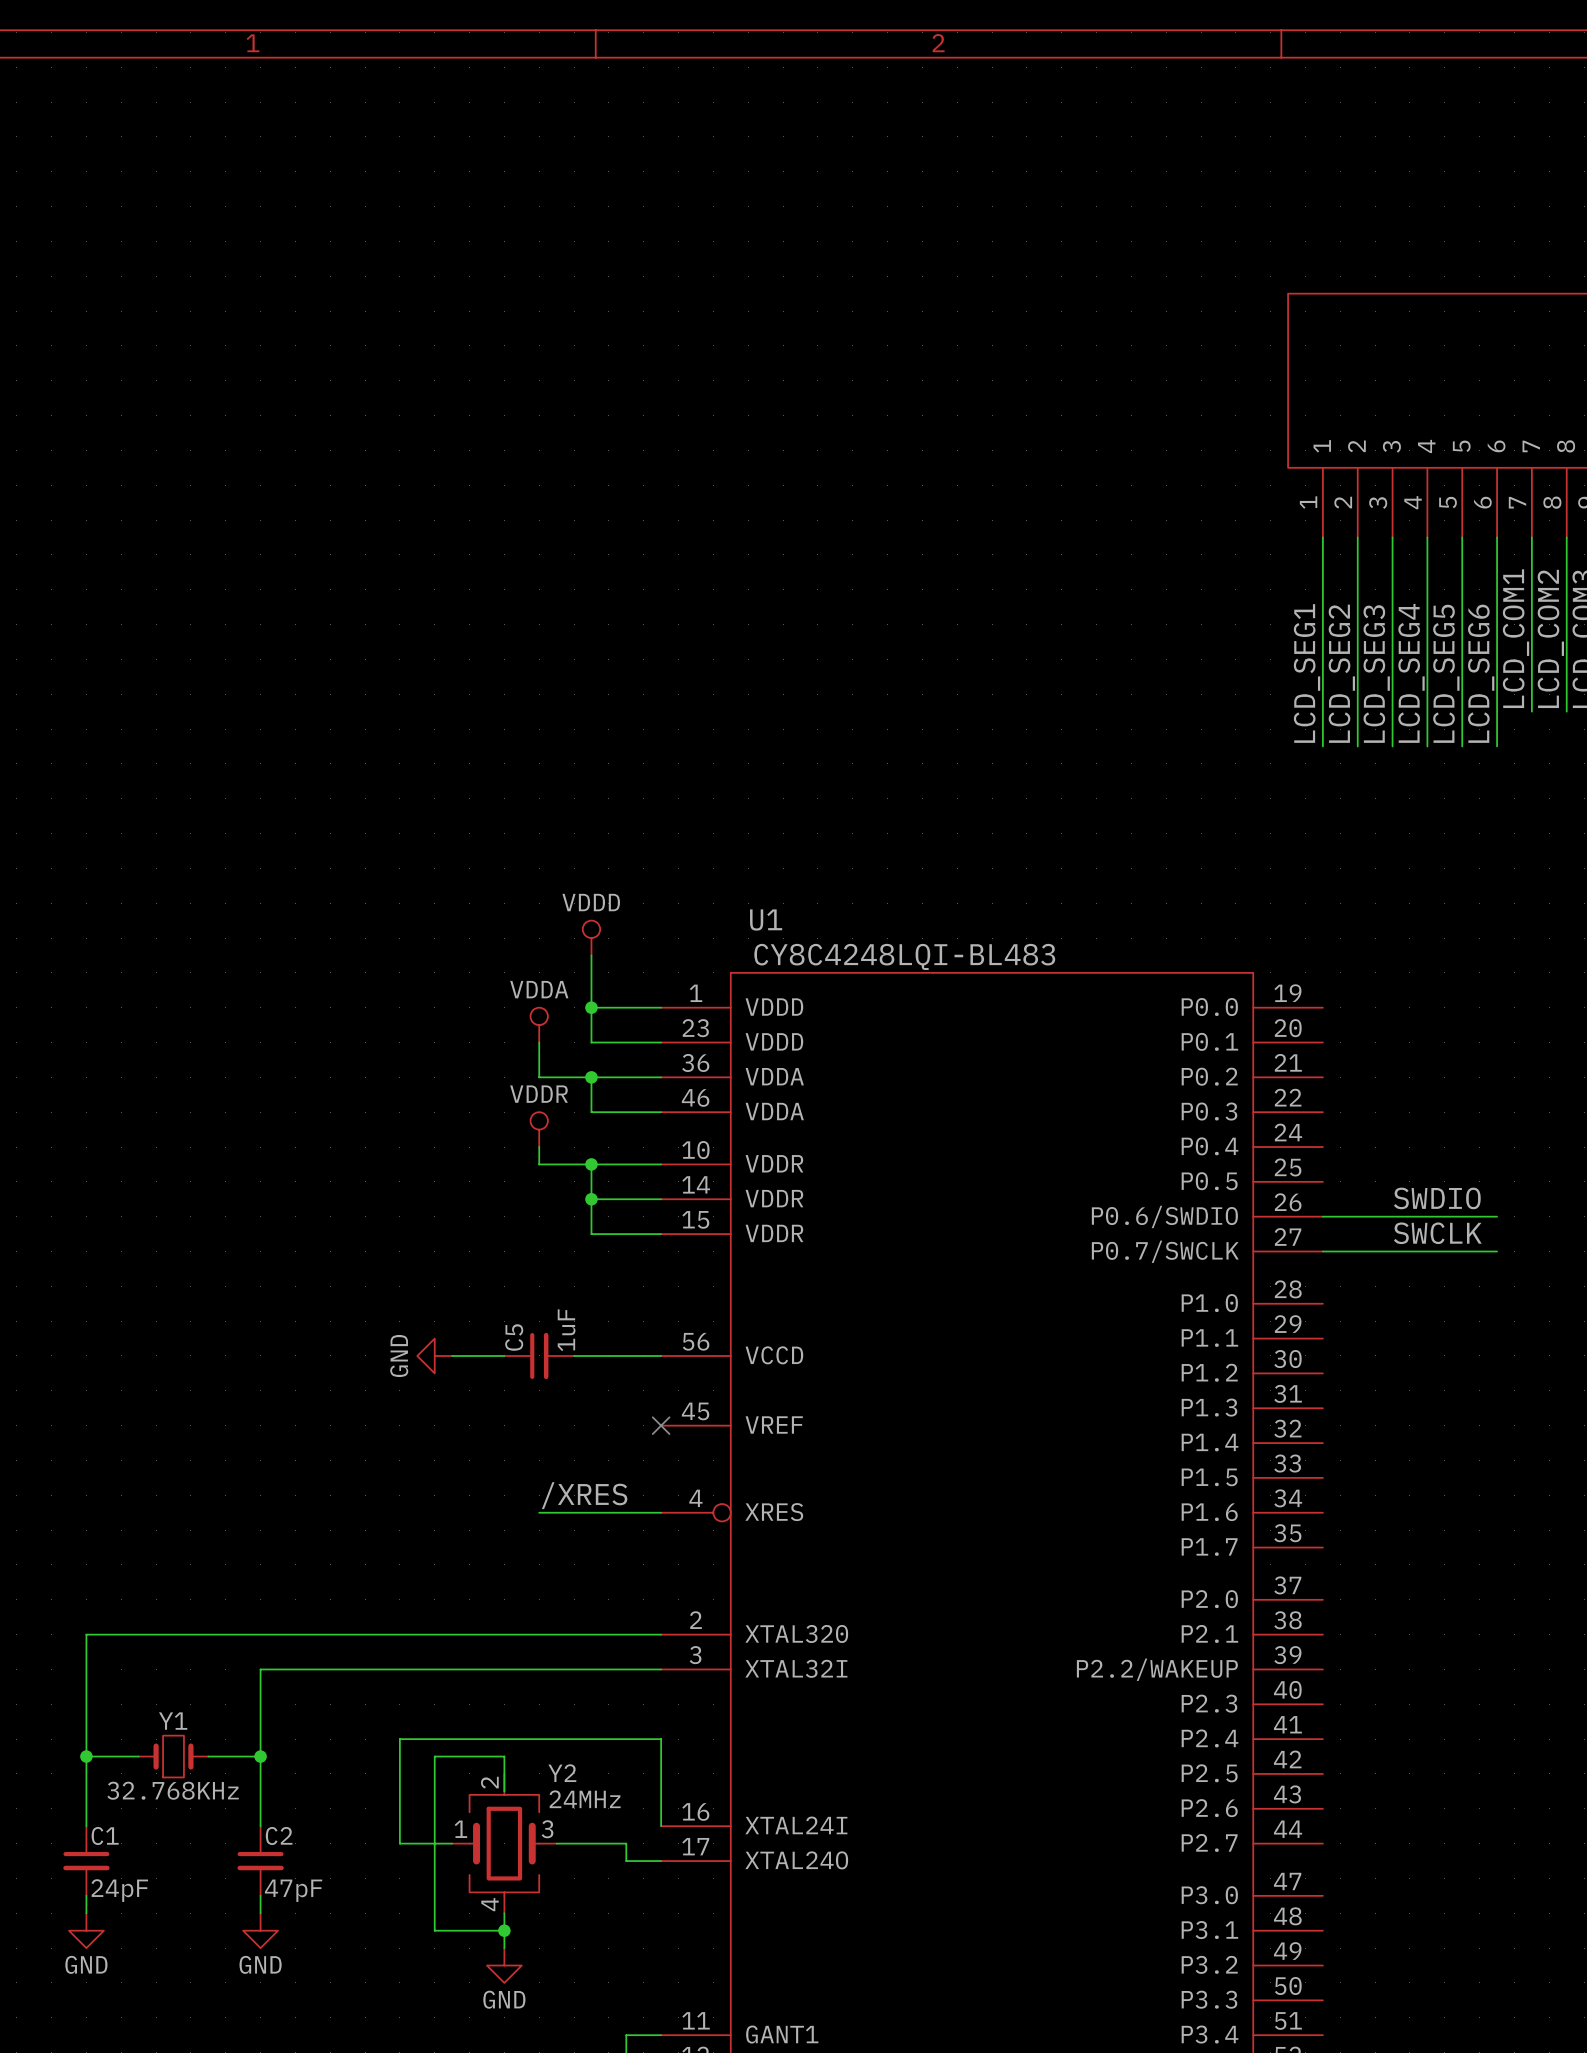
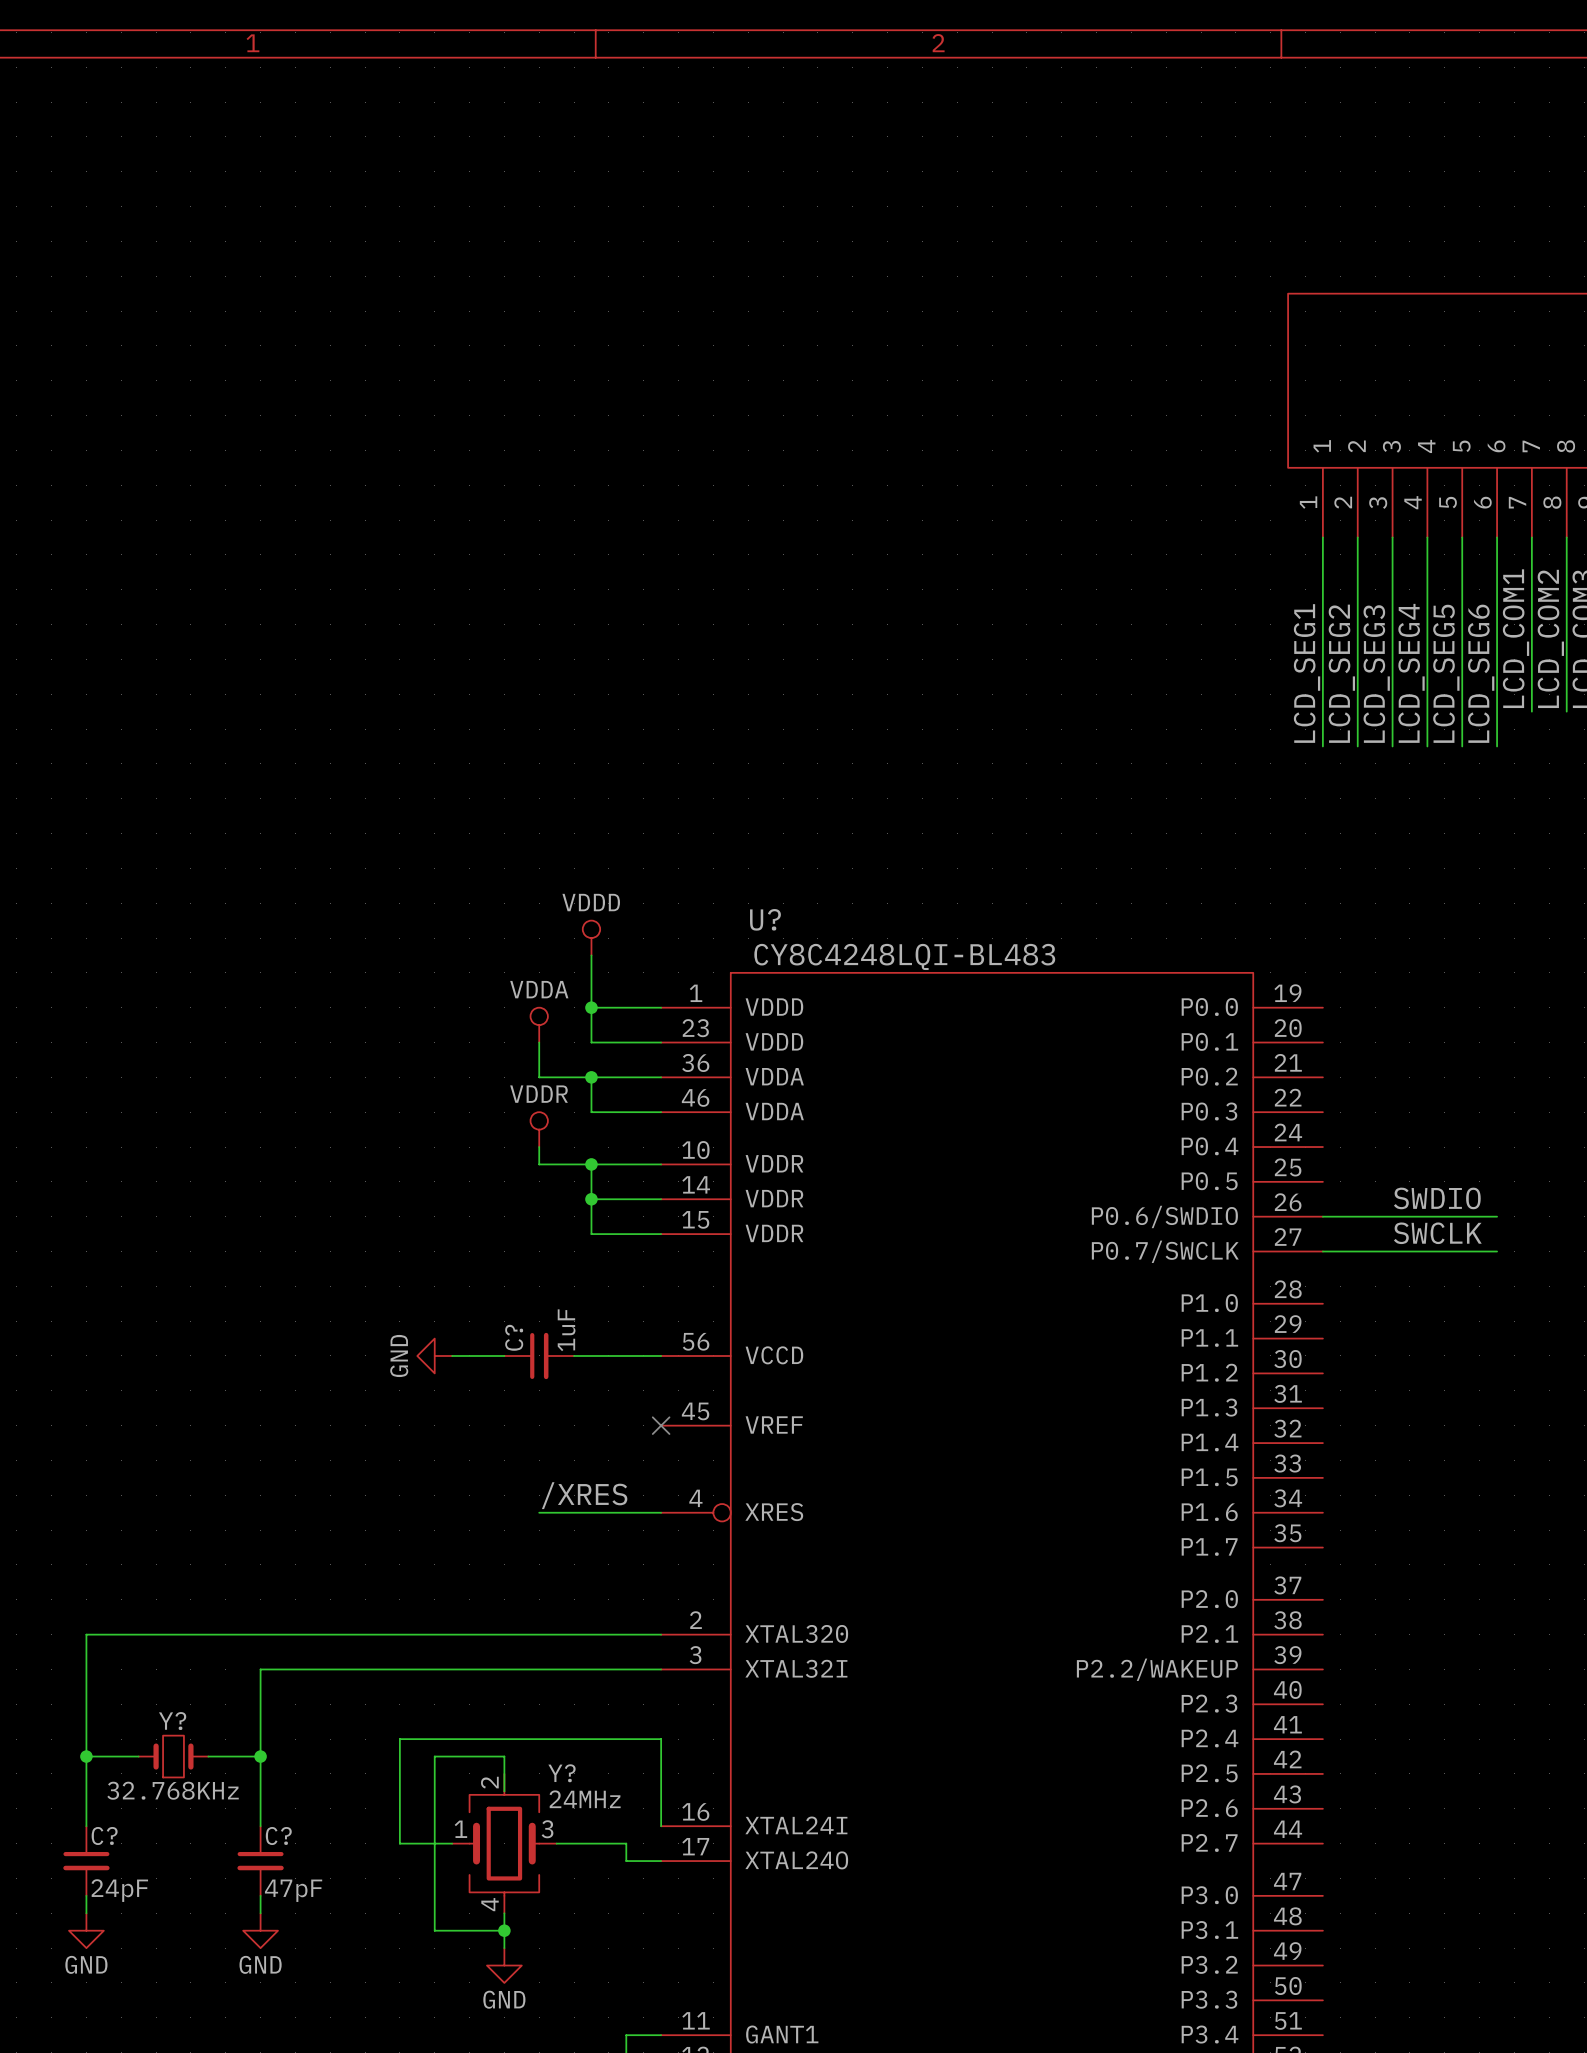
U1 name: U1 (766, 920) -> U? (765, 919)
C5 name: C5 (514, 1337) -> C? (514, 1337)
Y1 name: Y1 (173, 1721) -> Y? (172, 1721)
Y2 name: Y2 (562, 1773) -> Y? (561, 1773)
C1 name: C1 (105, 1836) -> C? (104, 1836)
C2 name: C2 (279, 1836) -> C? (278, 1836)

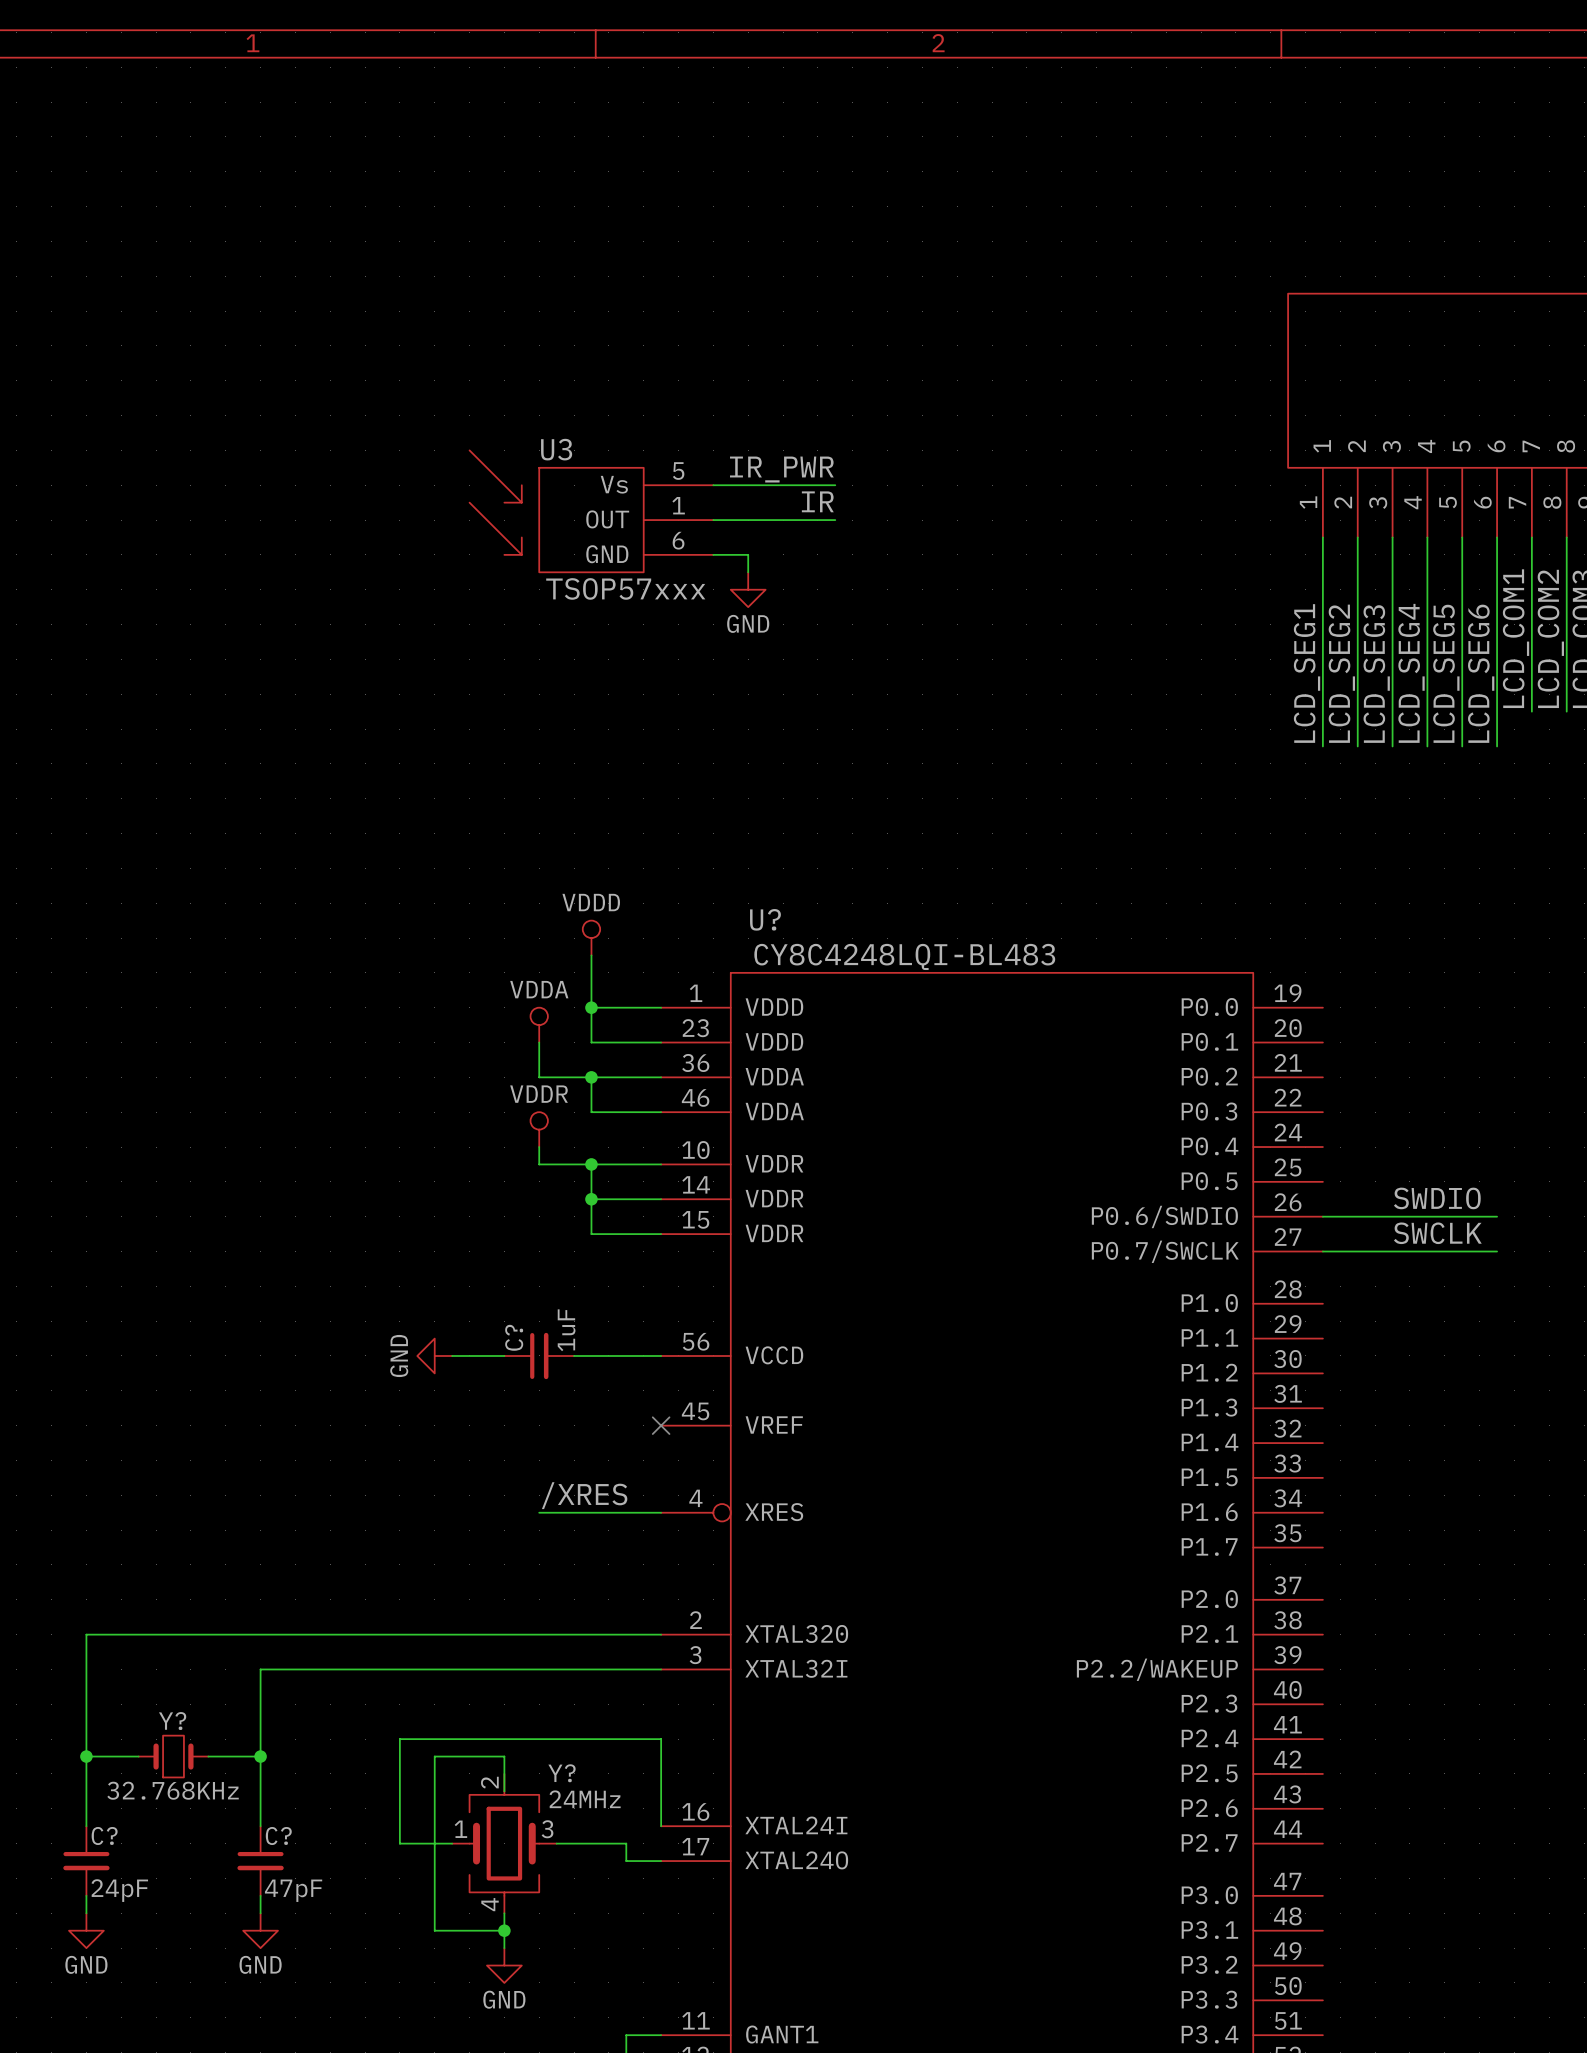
label: none -> IR_PWR (781, 469)
wire: none -> (713, 485) (835, 485)
label: none -> IR (817, 501)
U3: none -> TSOP57xxx (591, 511)
wire: none -> (713, 520) (835, 520)
wire: none -> (713, 554) (748, 554) (748, 572)
power symbol: none -> GND (748, 589)

